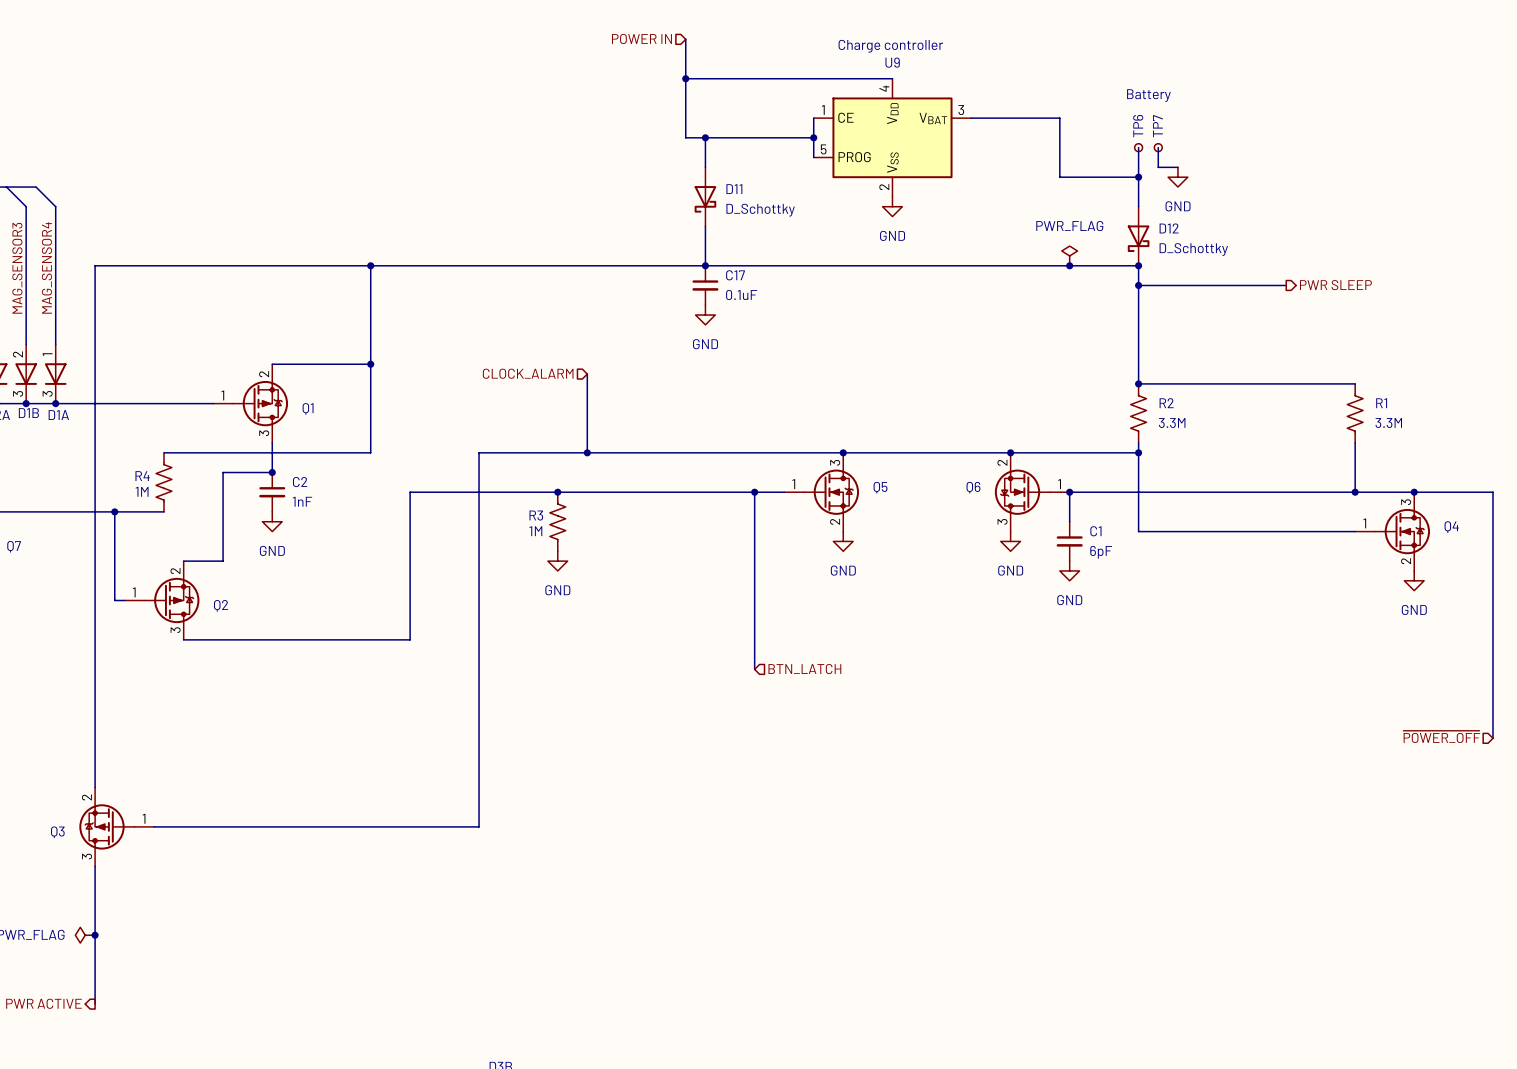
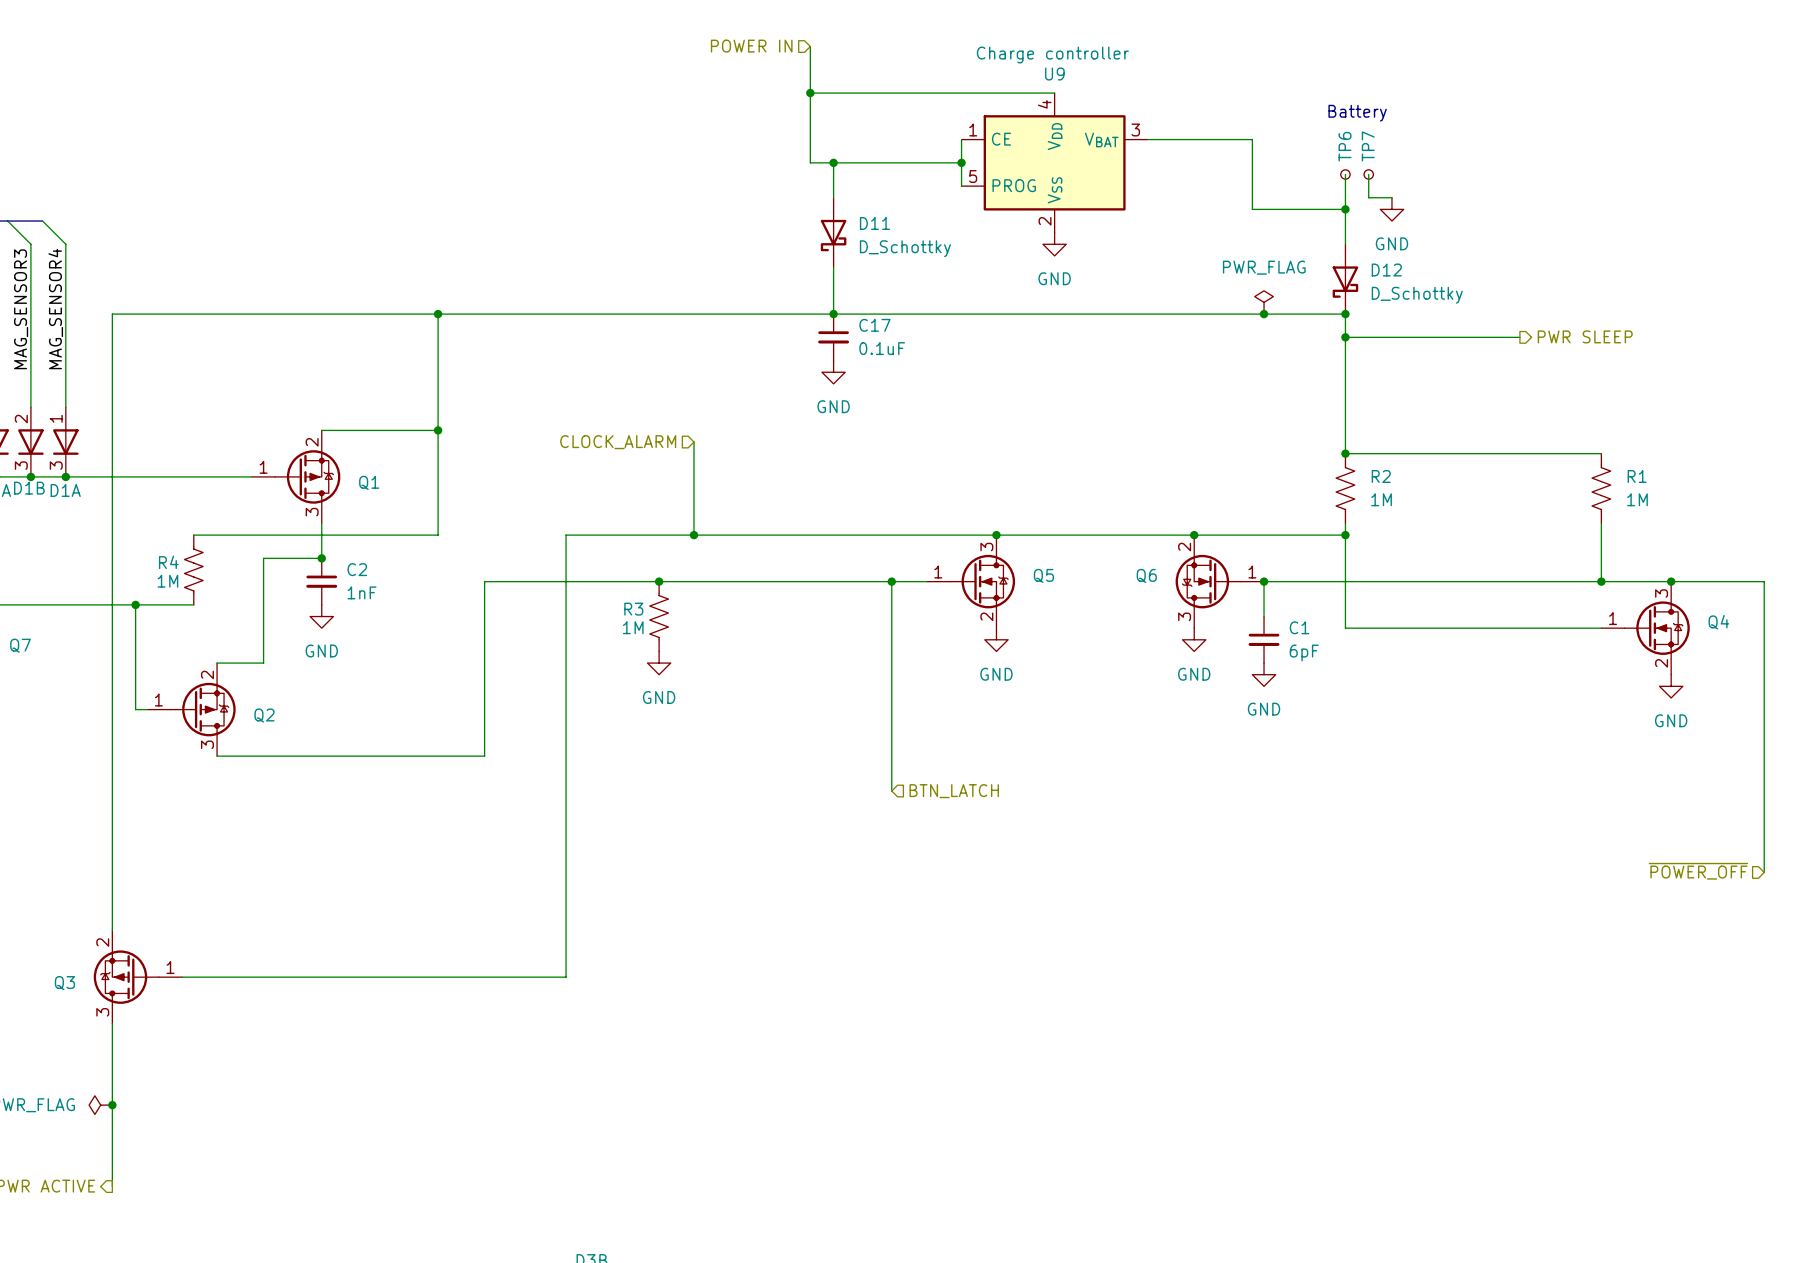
R2 value: 3.3M (1172, 422) -> 1M (1381, 499)
R1 value: 3.3M (1388, 422) -> 1M (1637, 499)

